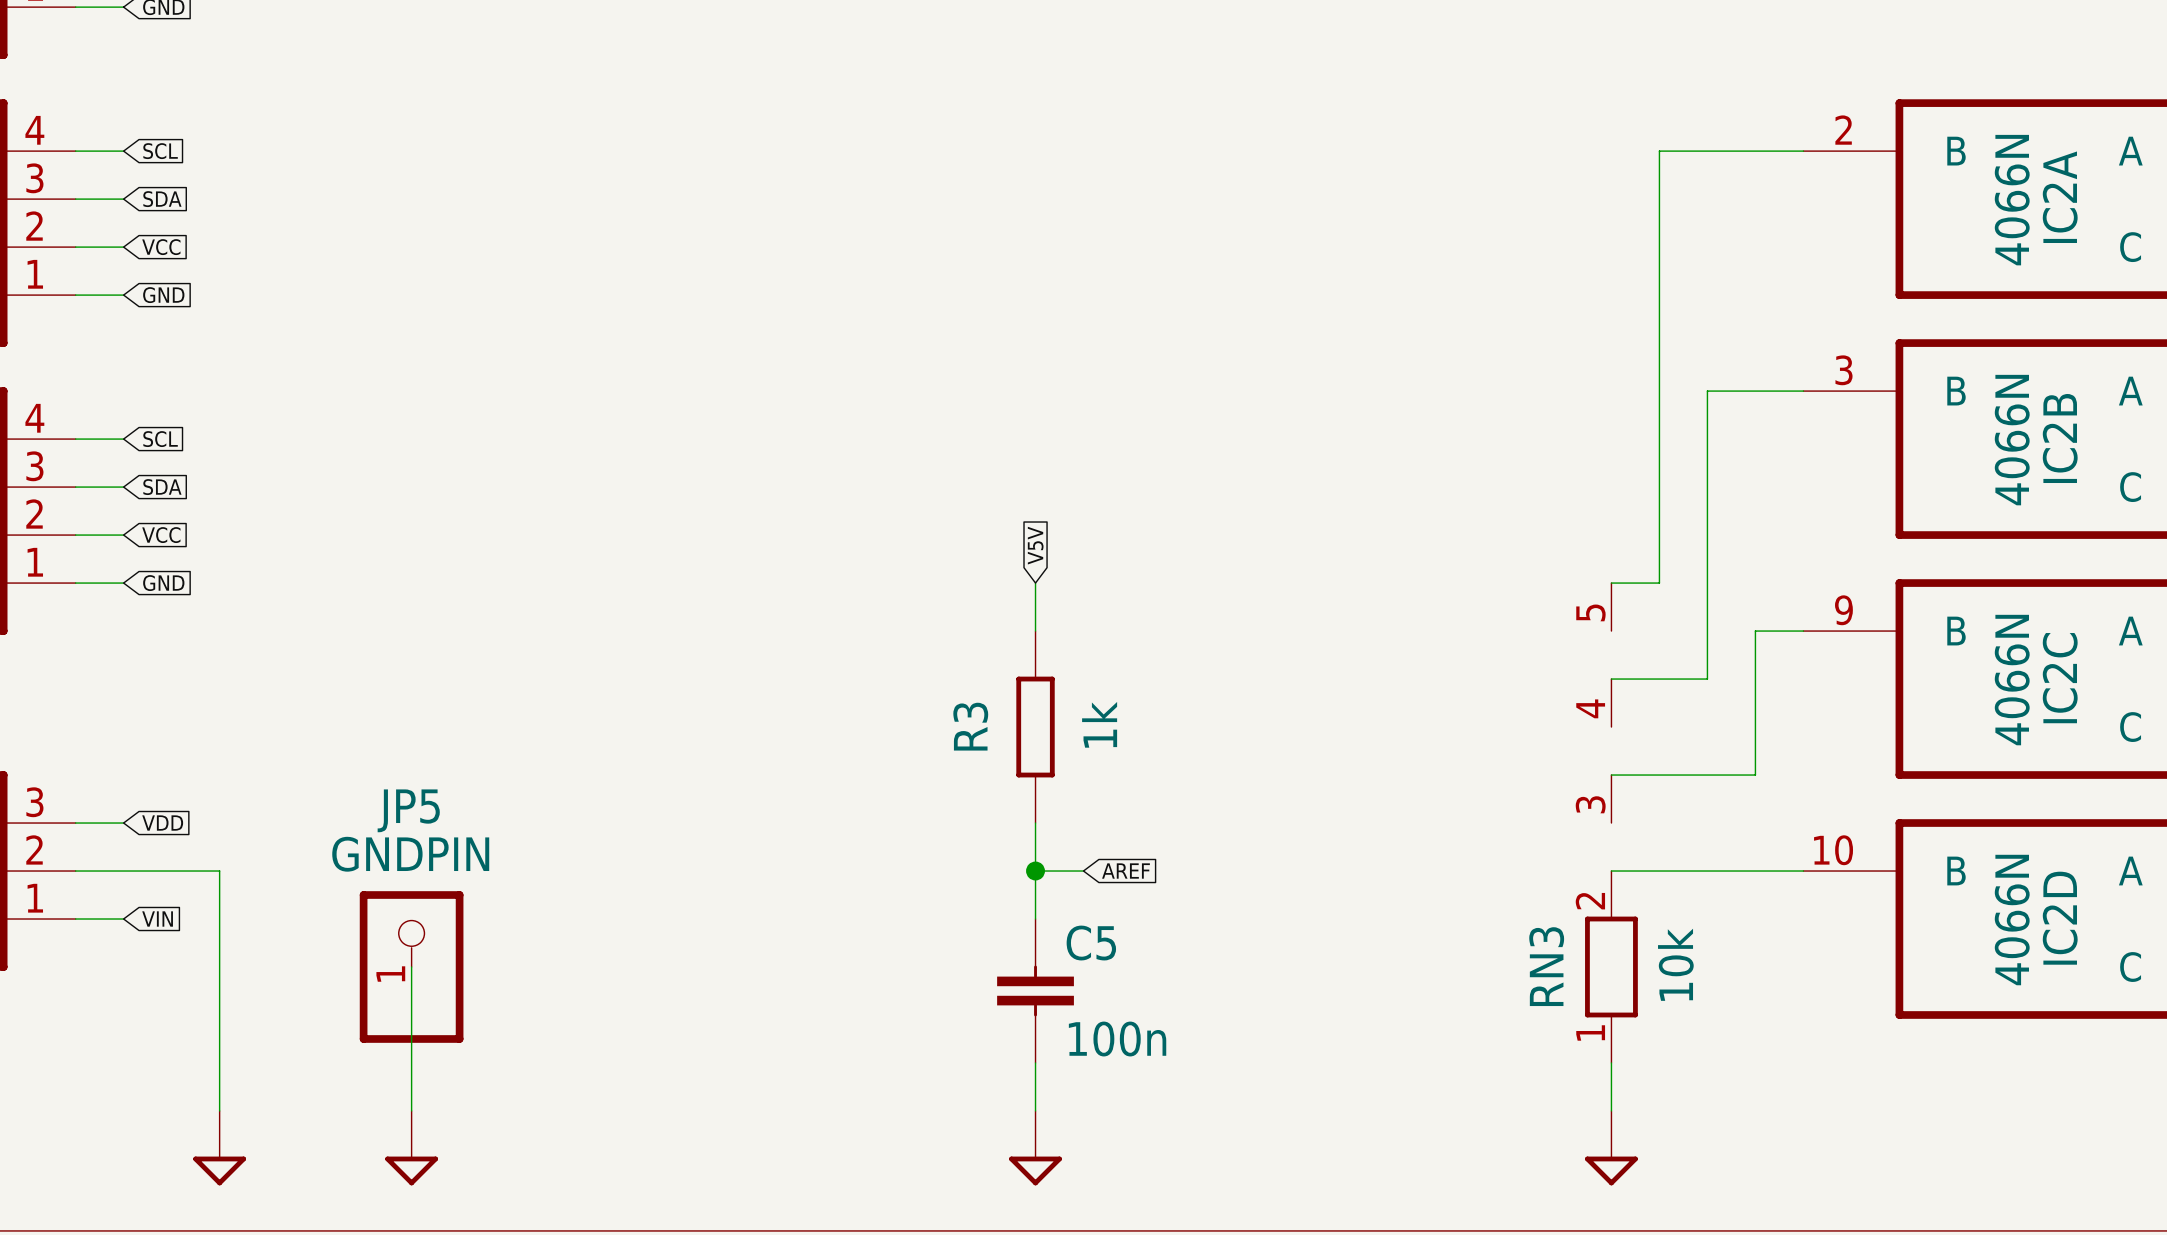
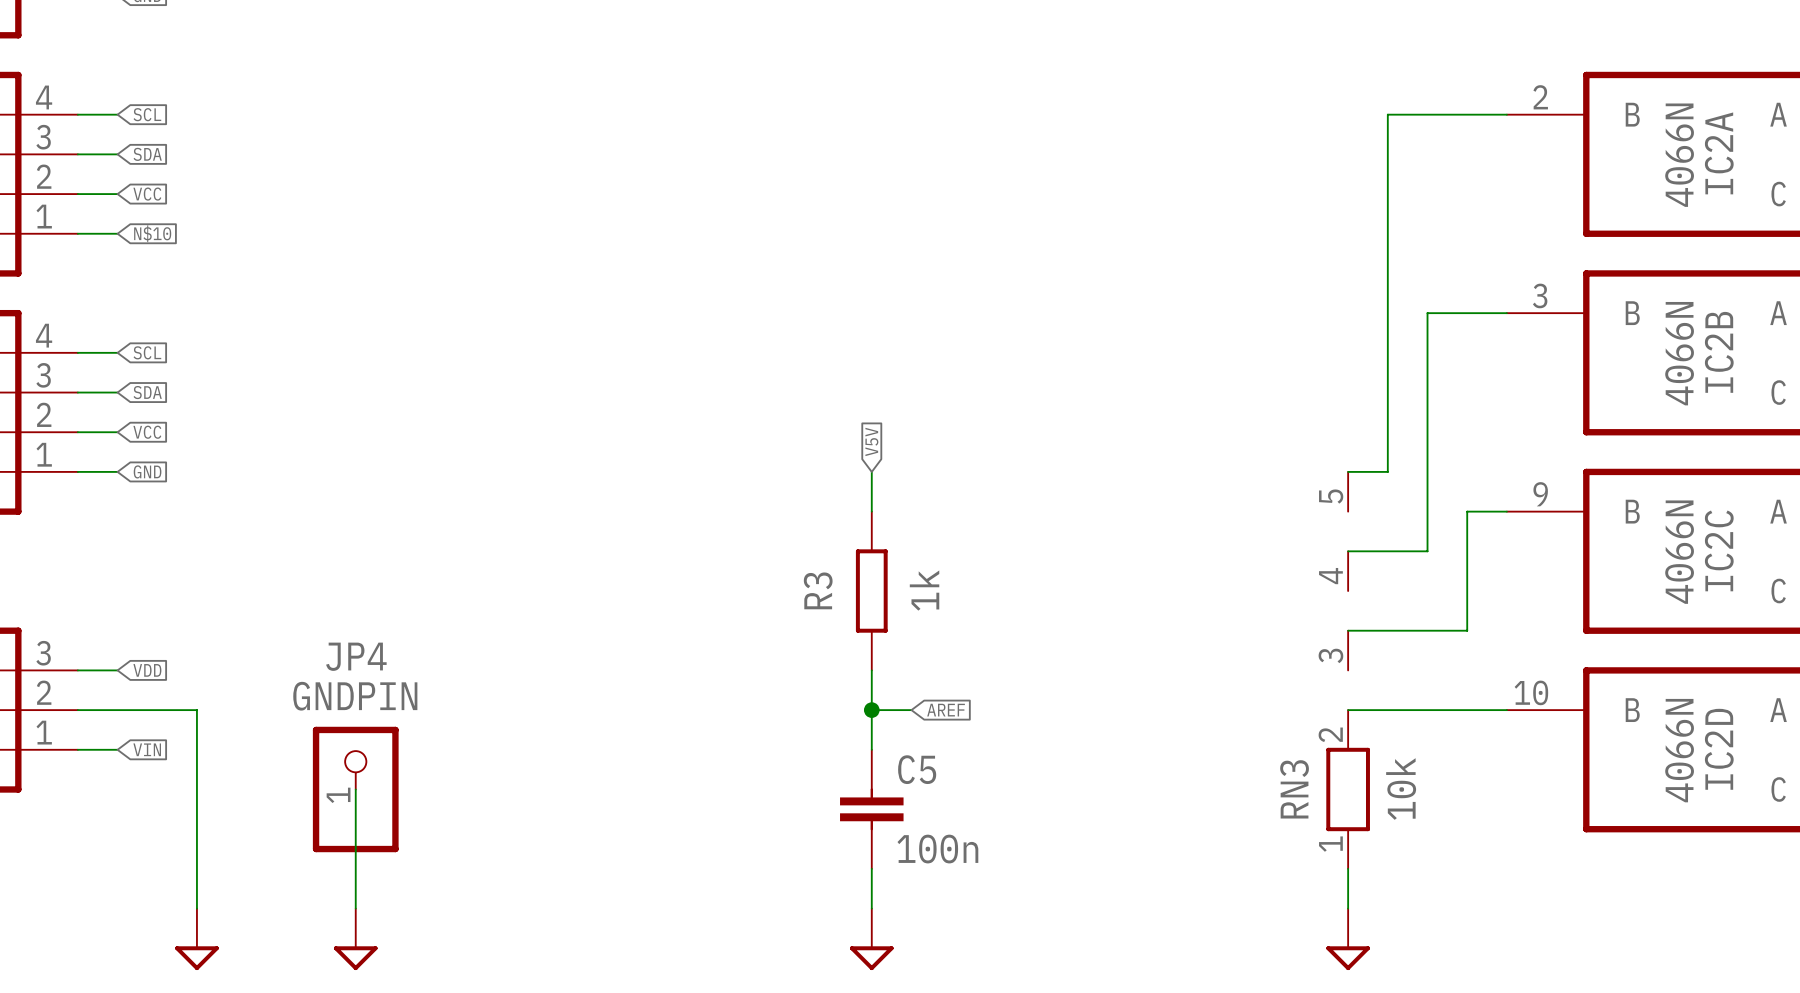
global label: GND (163, 295) -> N$10 (152, 233)
JP5 name: JP5 (408, 810) -> JP4 (356, 656)

